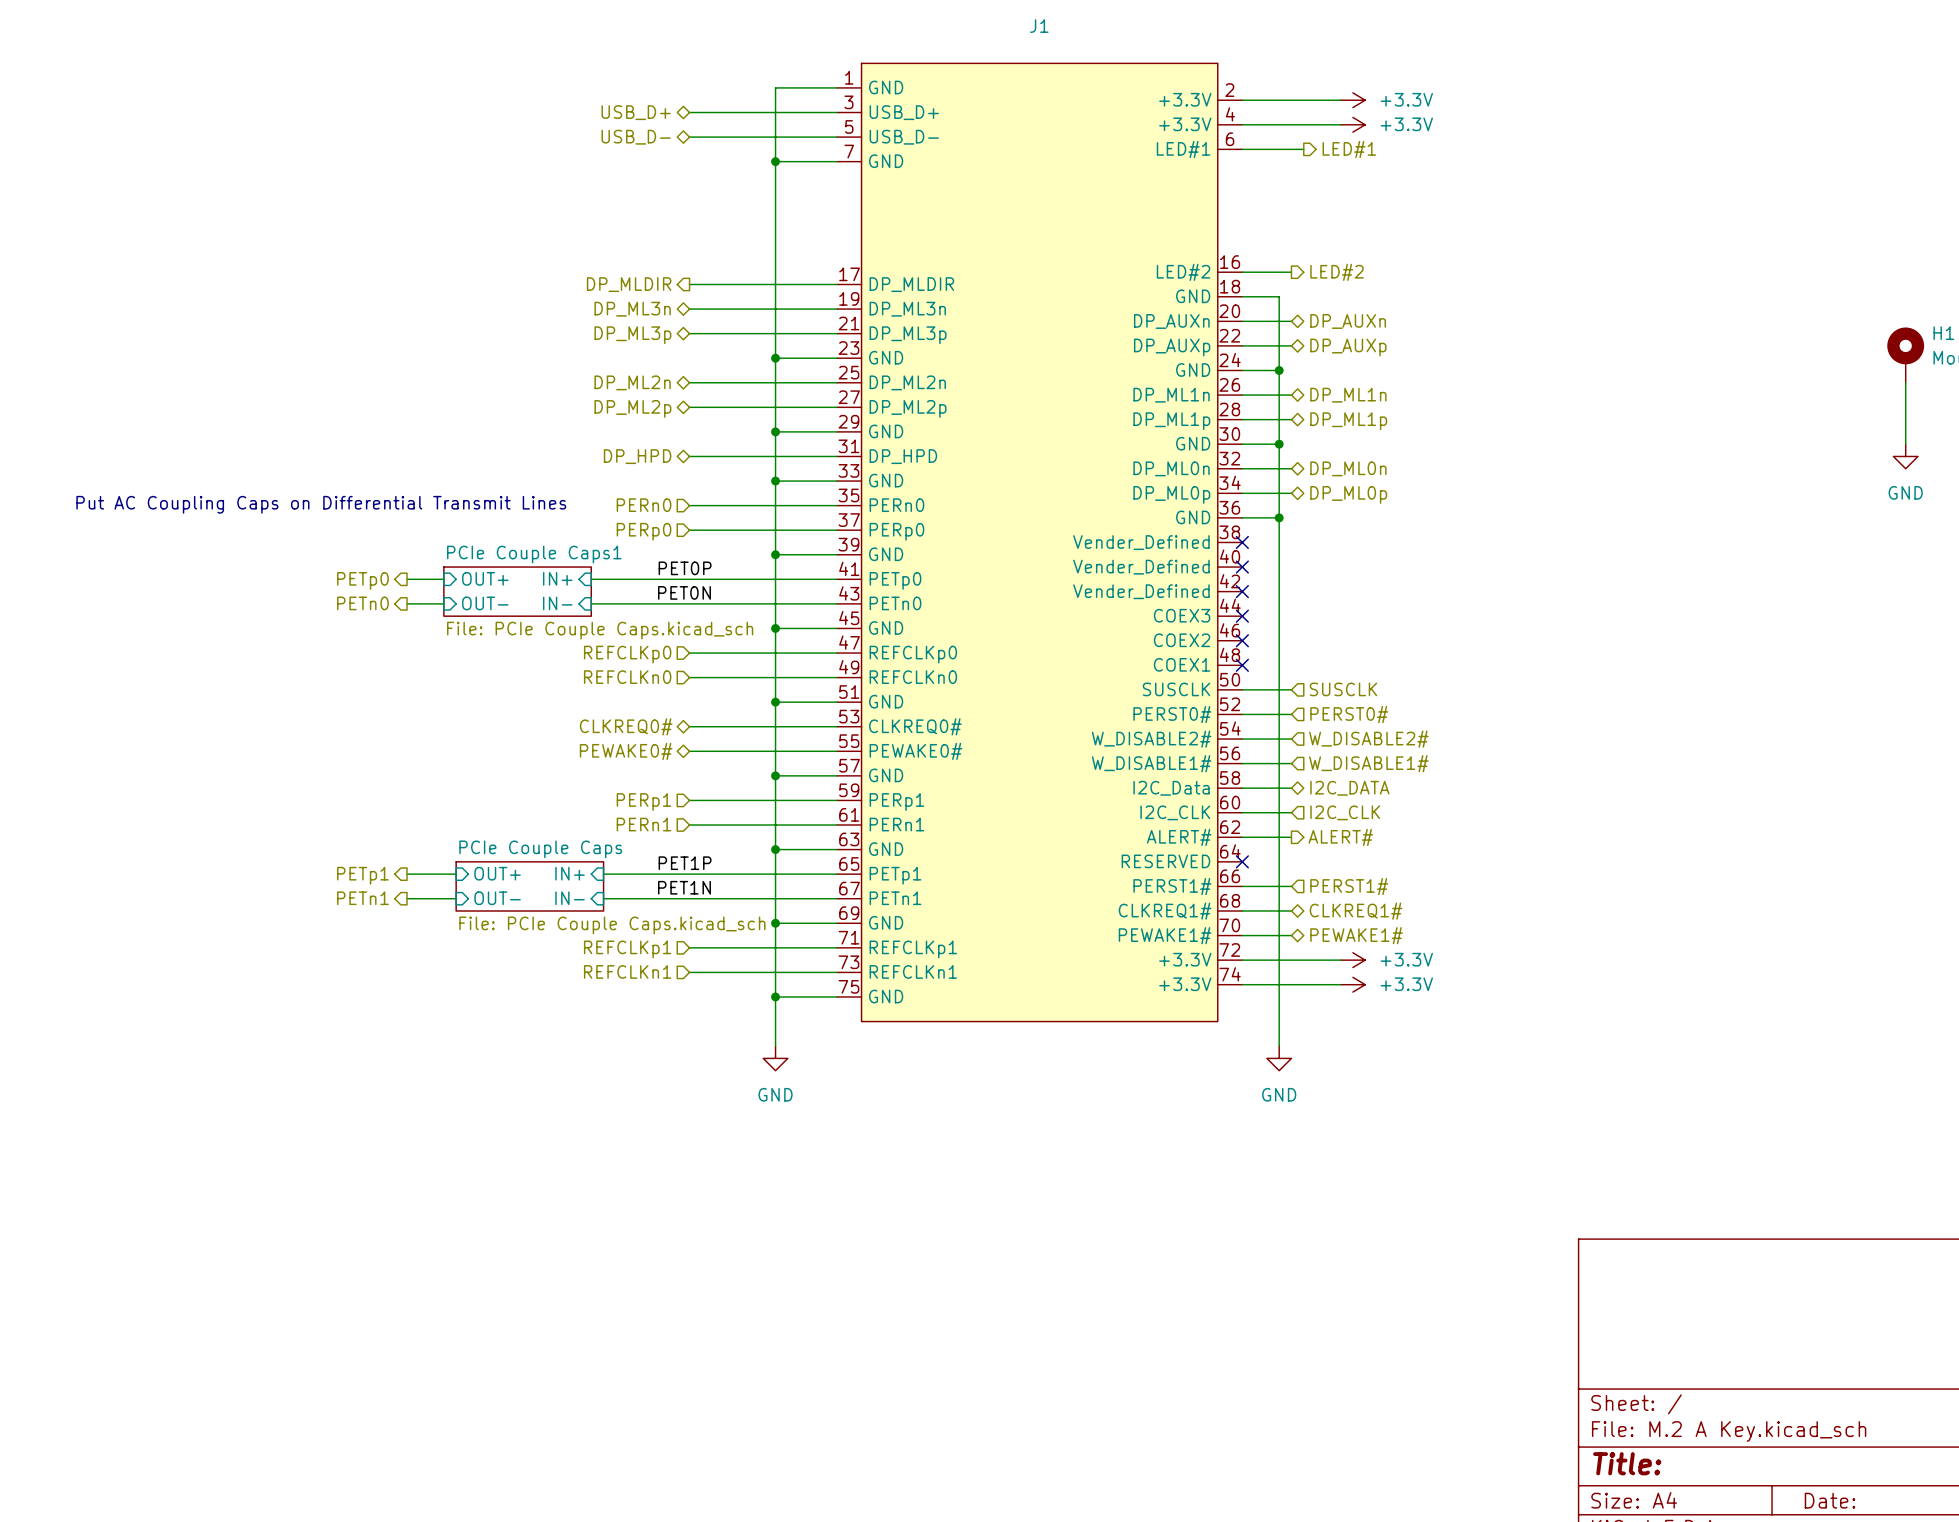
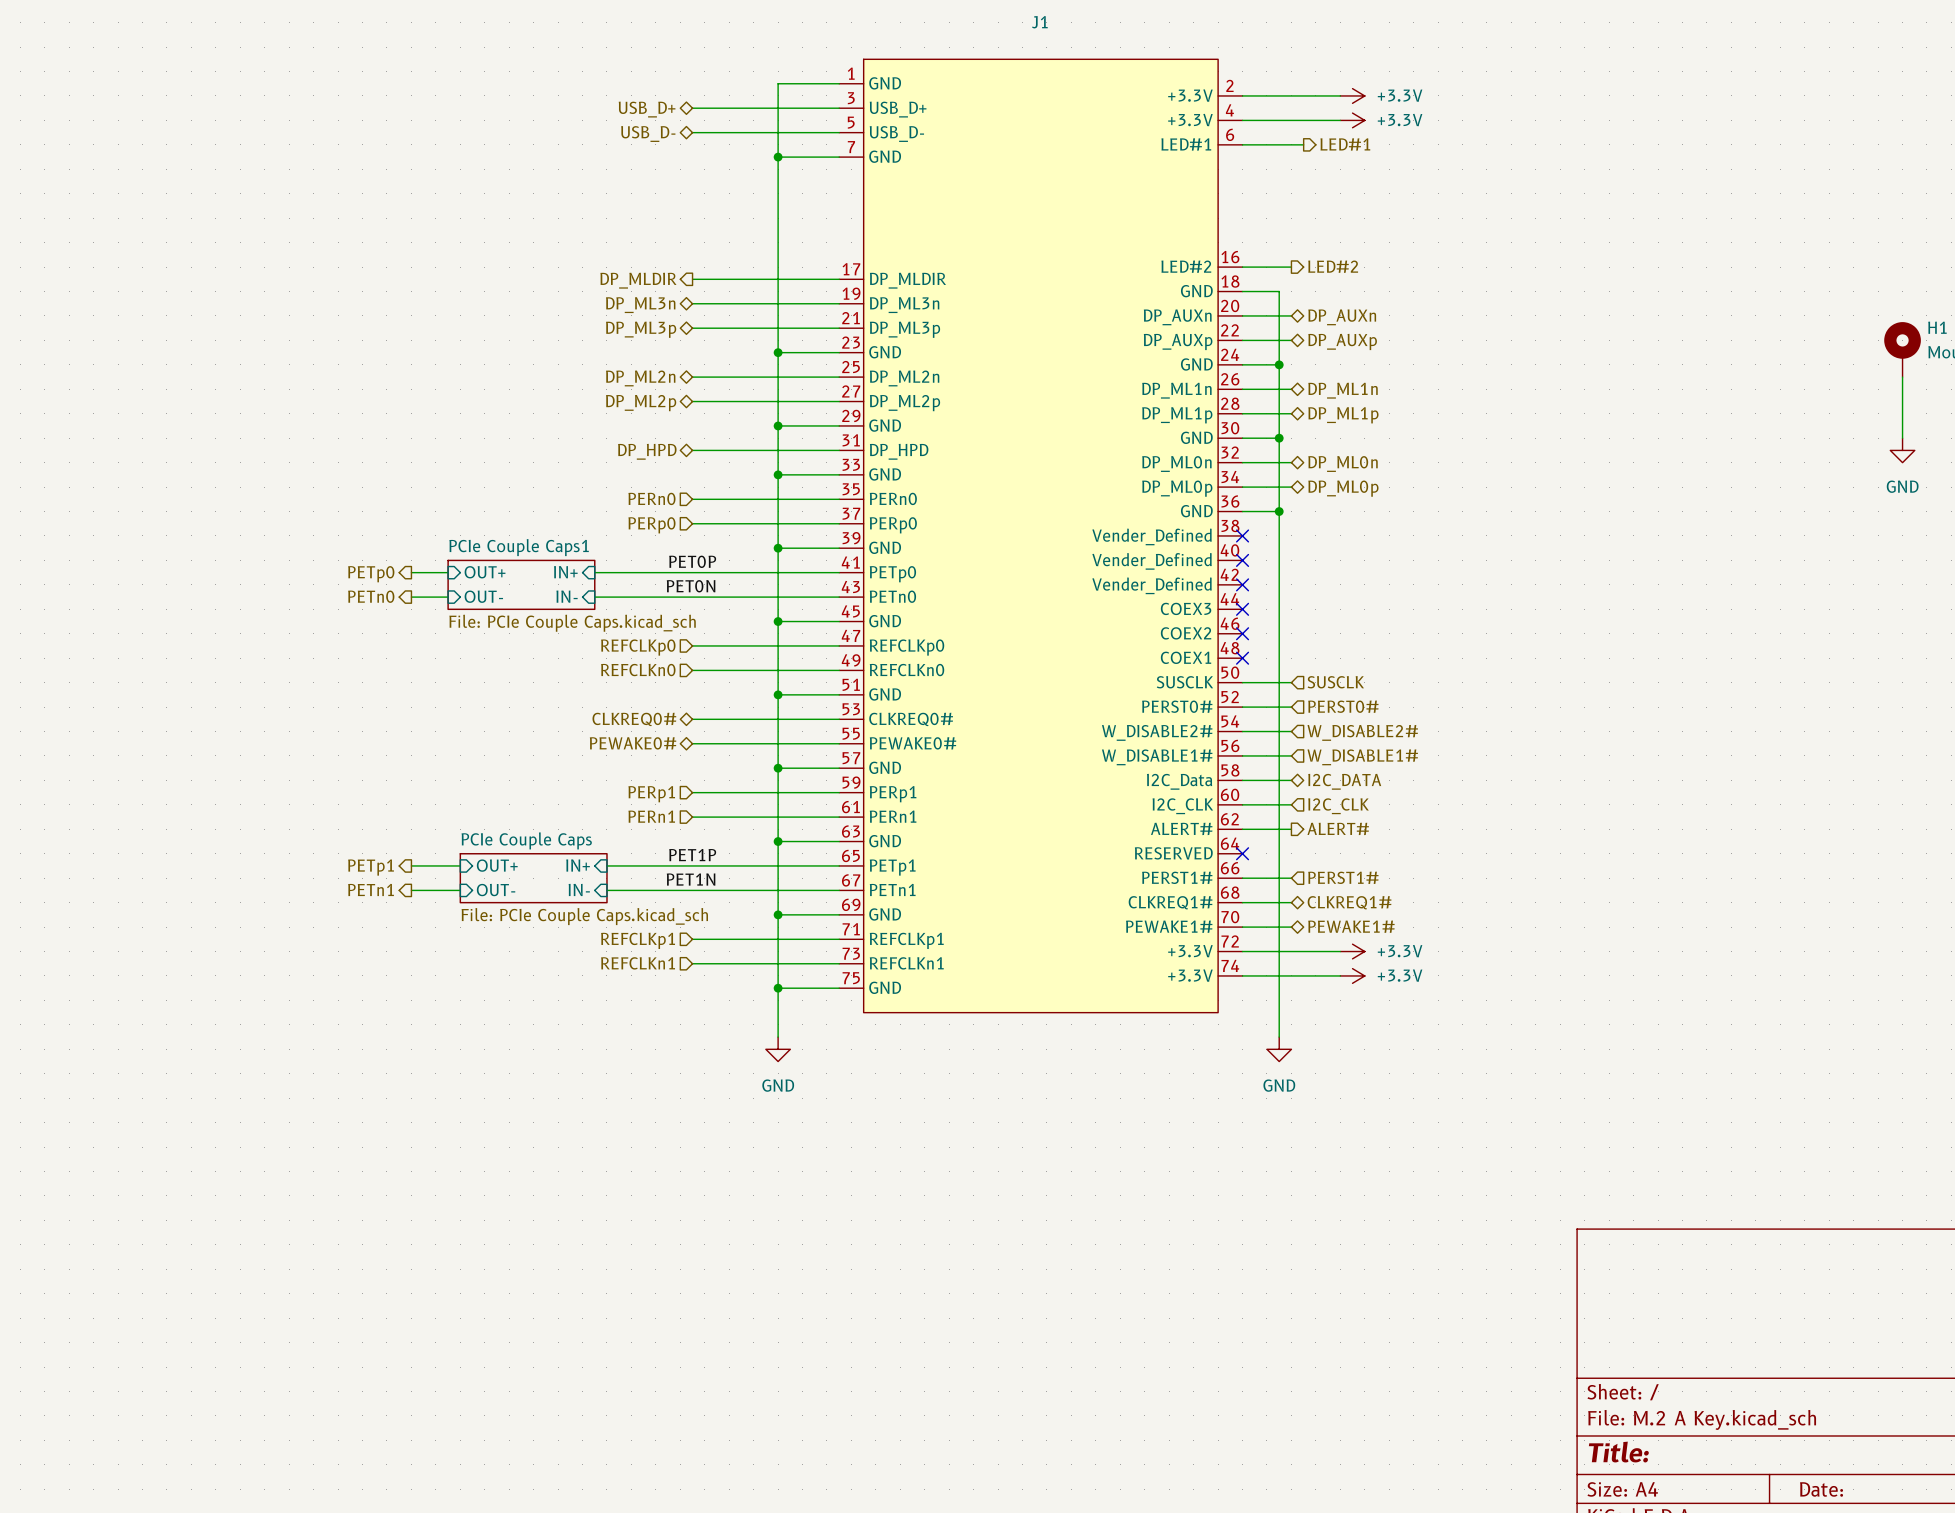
text: Put AC Coupling Caps on Differential Transmit Lines (321, 504) -> none

